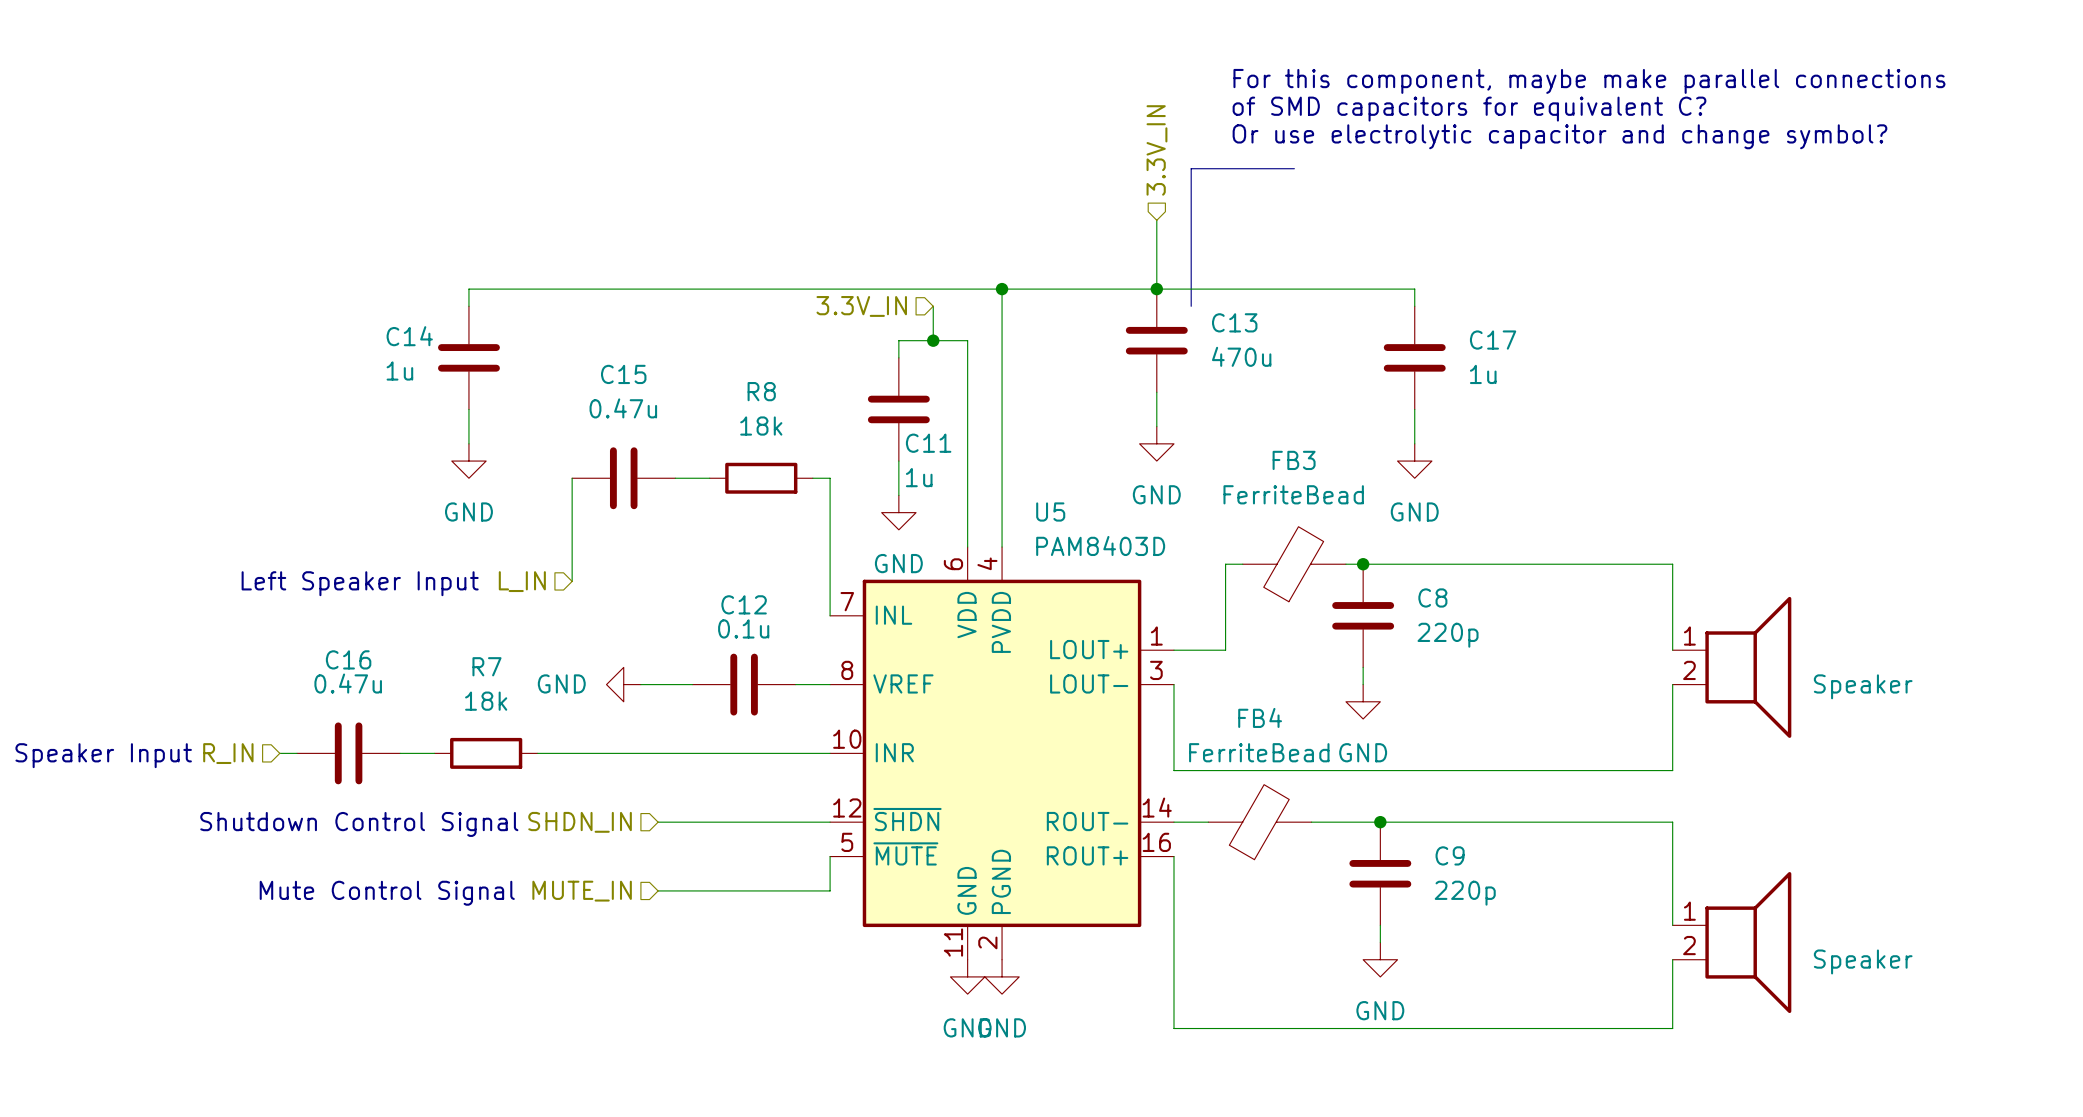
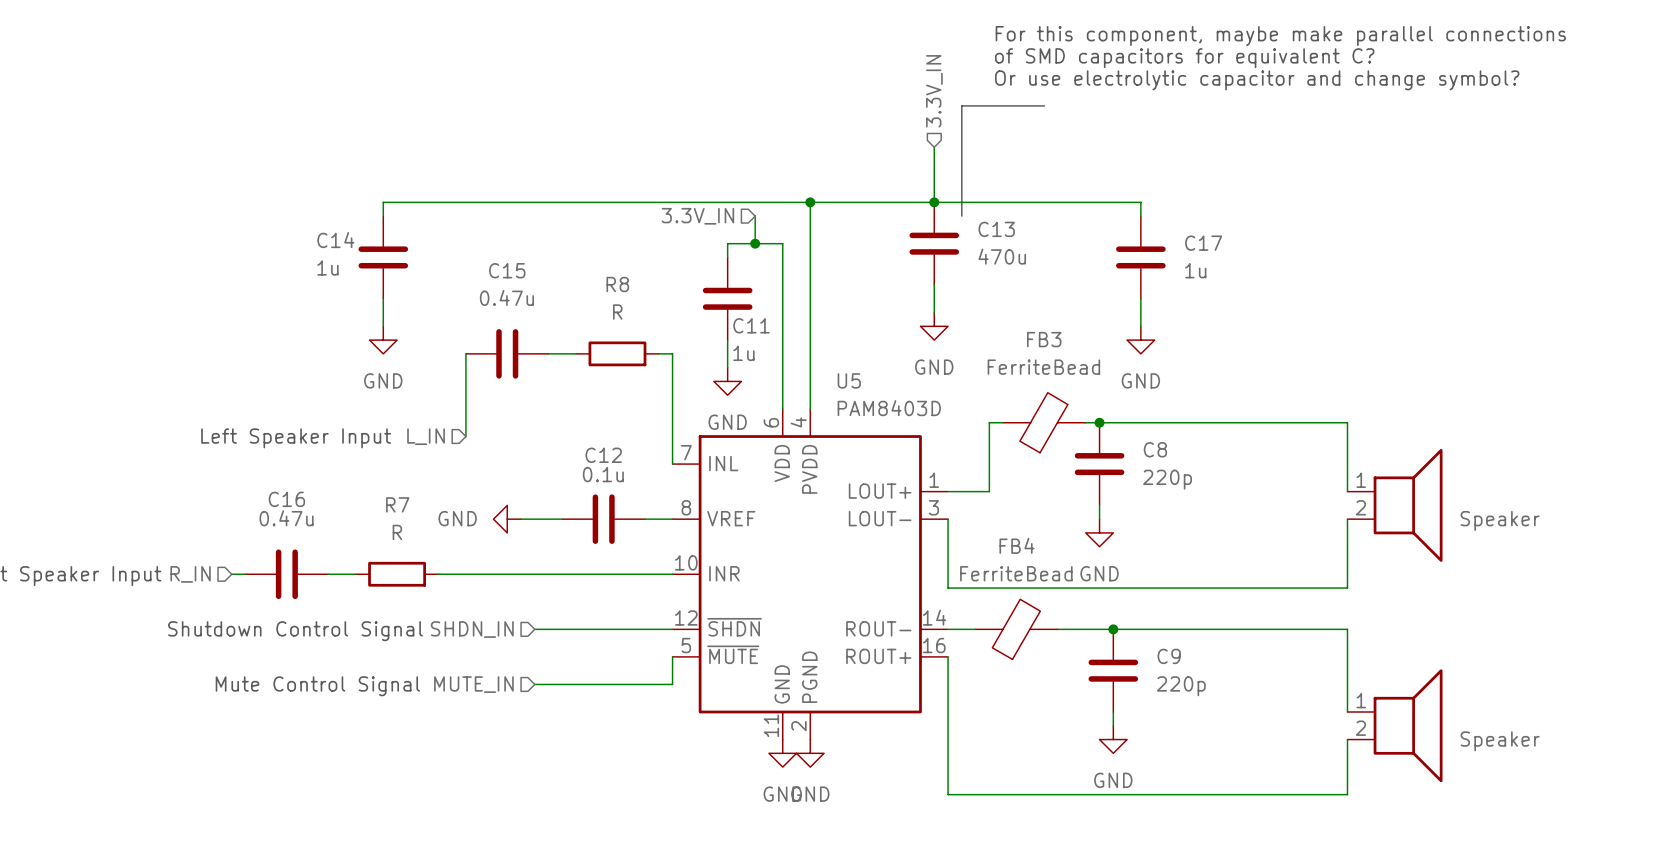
R8 value: 18k (761, 426) -> R (617, 312)
R7 value: 18k (486, 701) -> R (397, 532)

